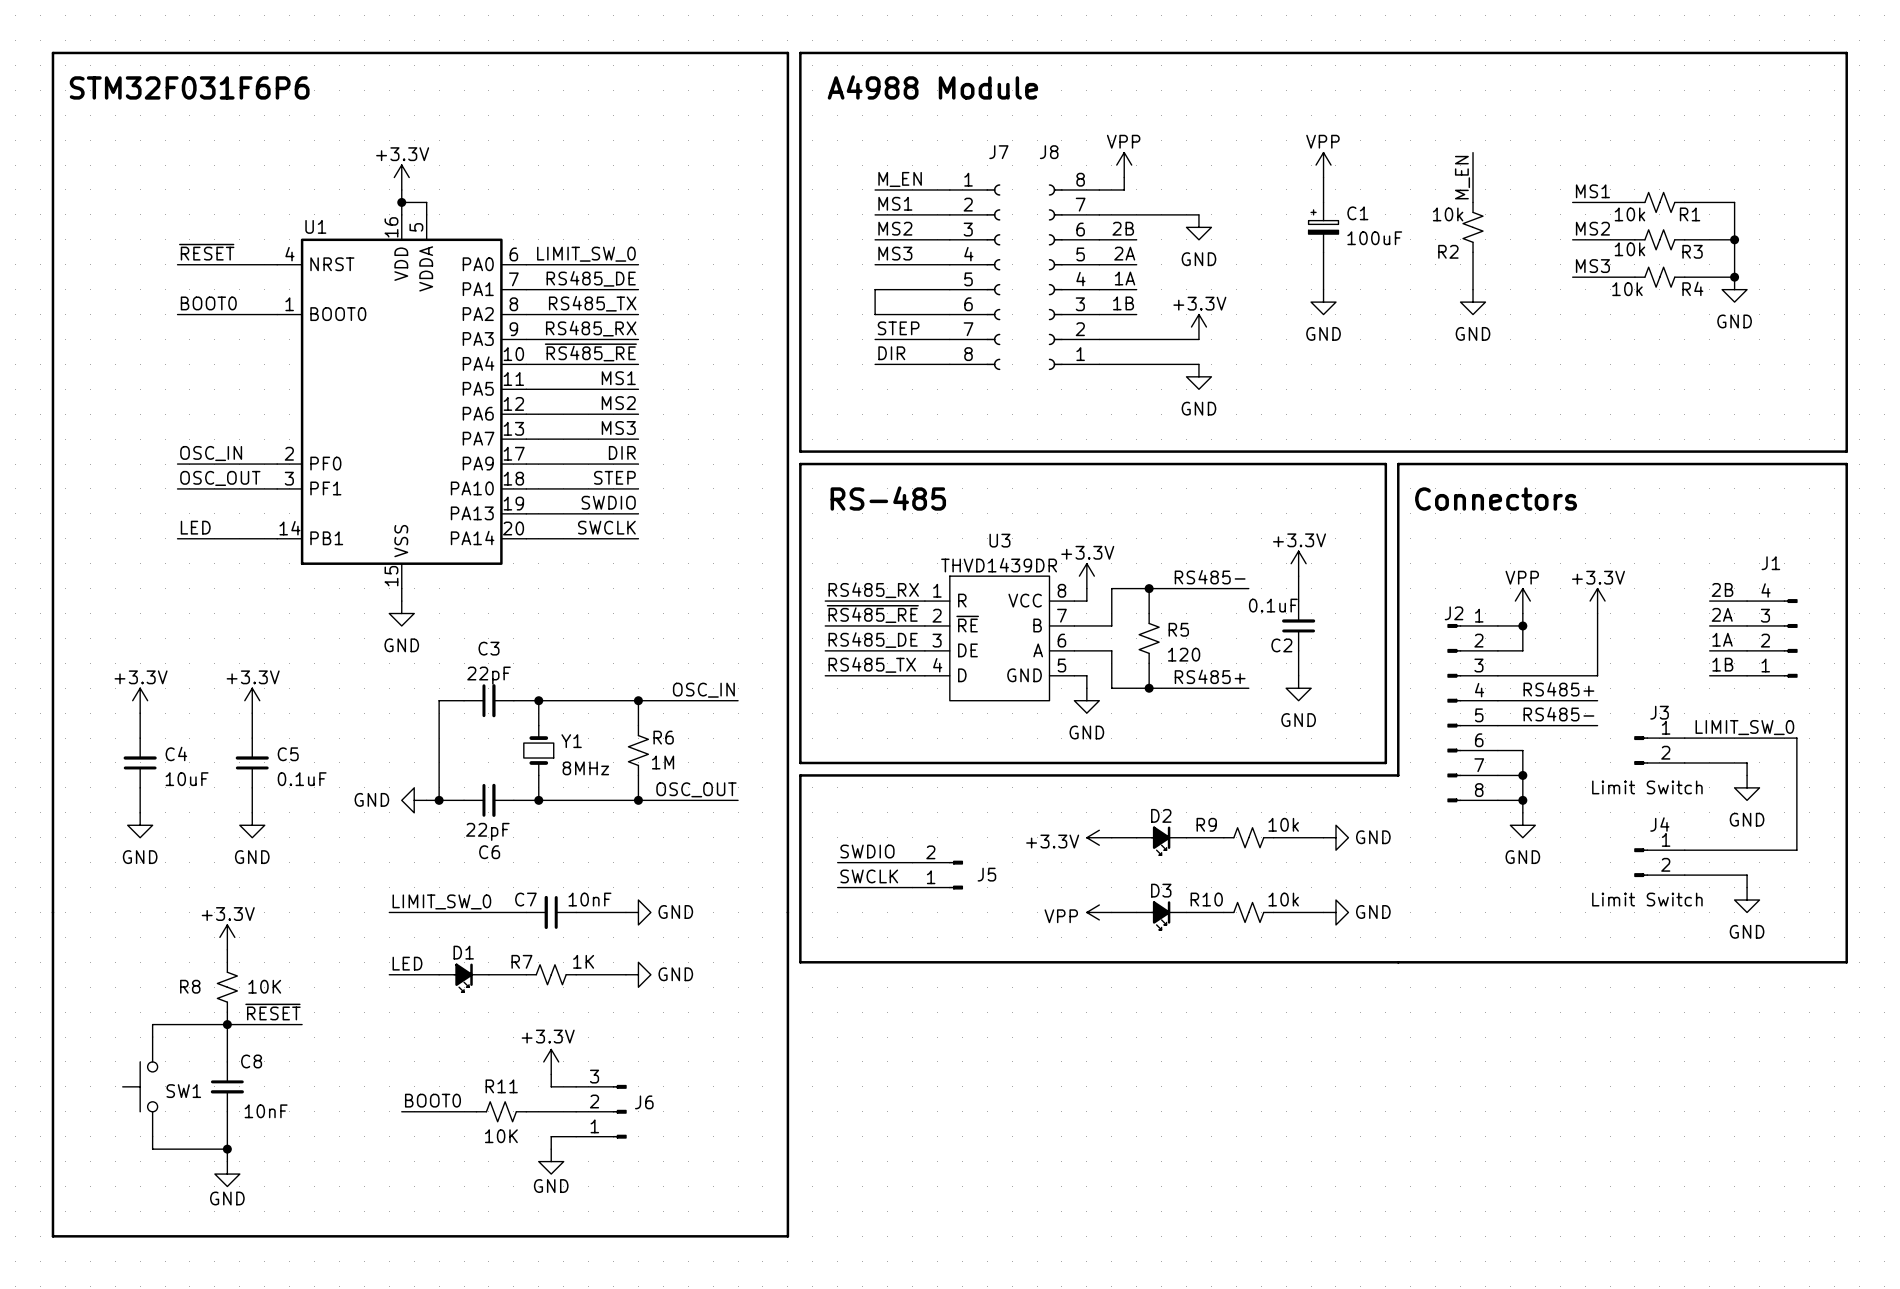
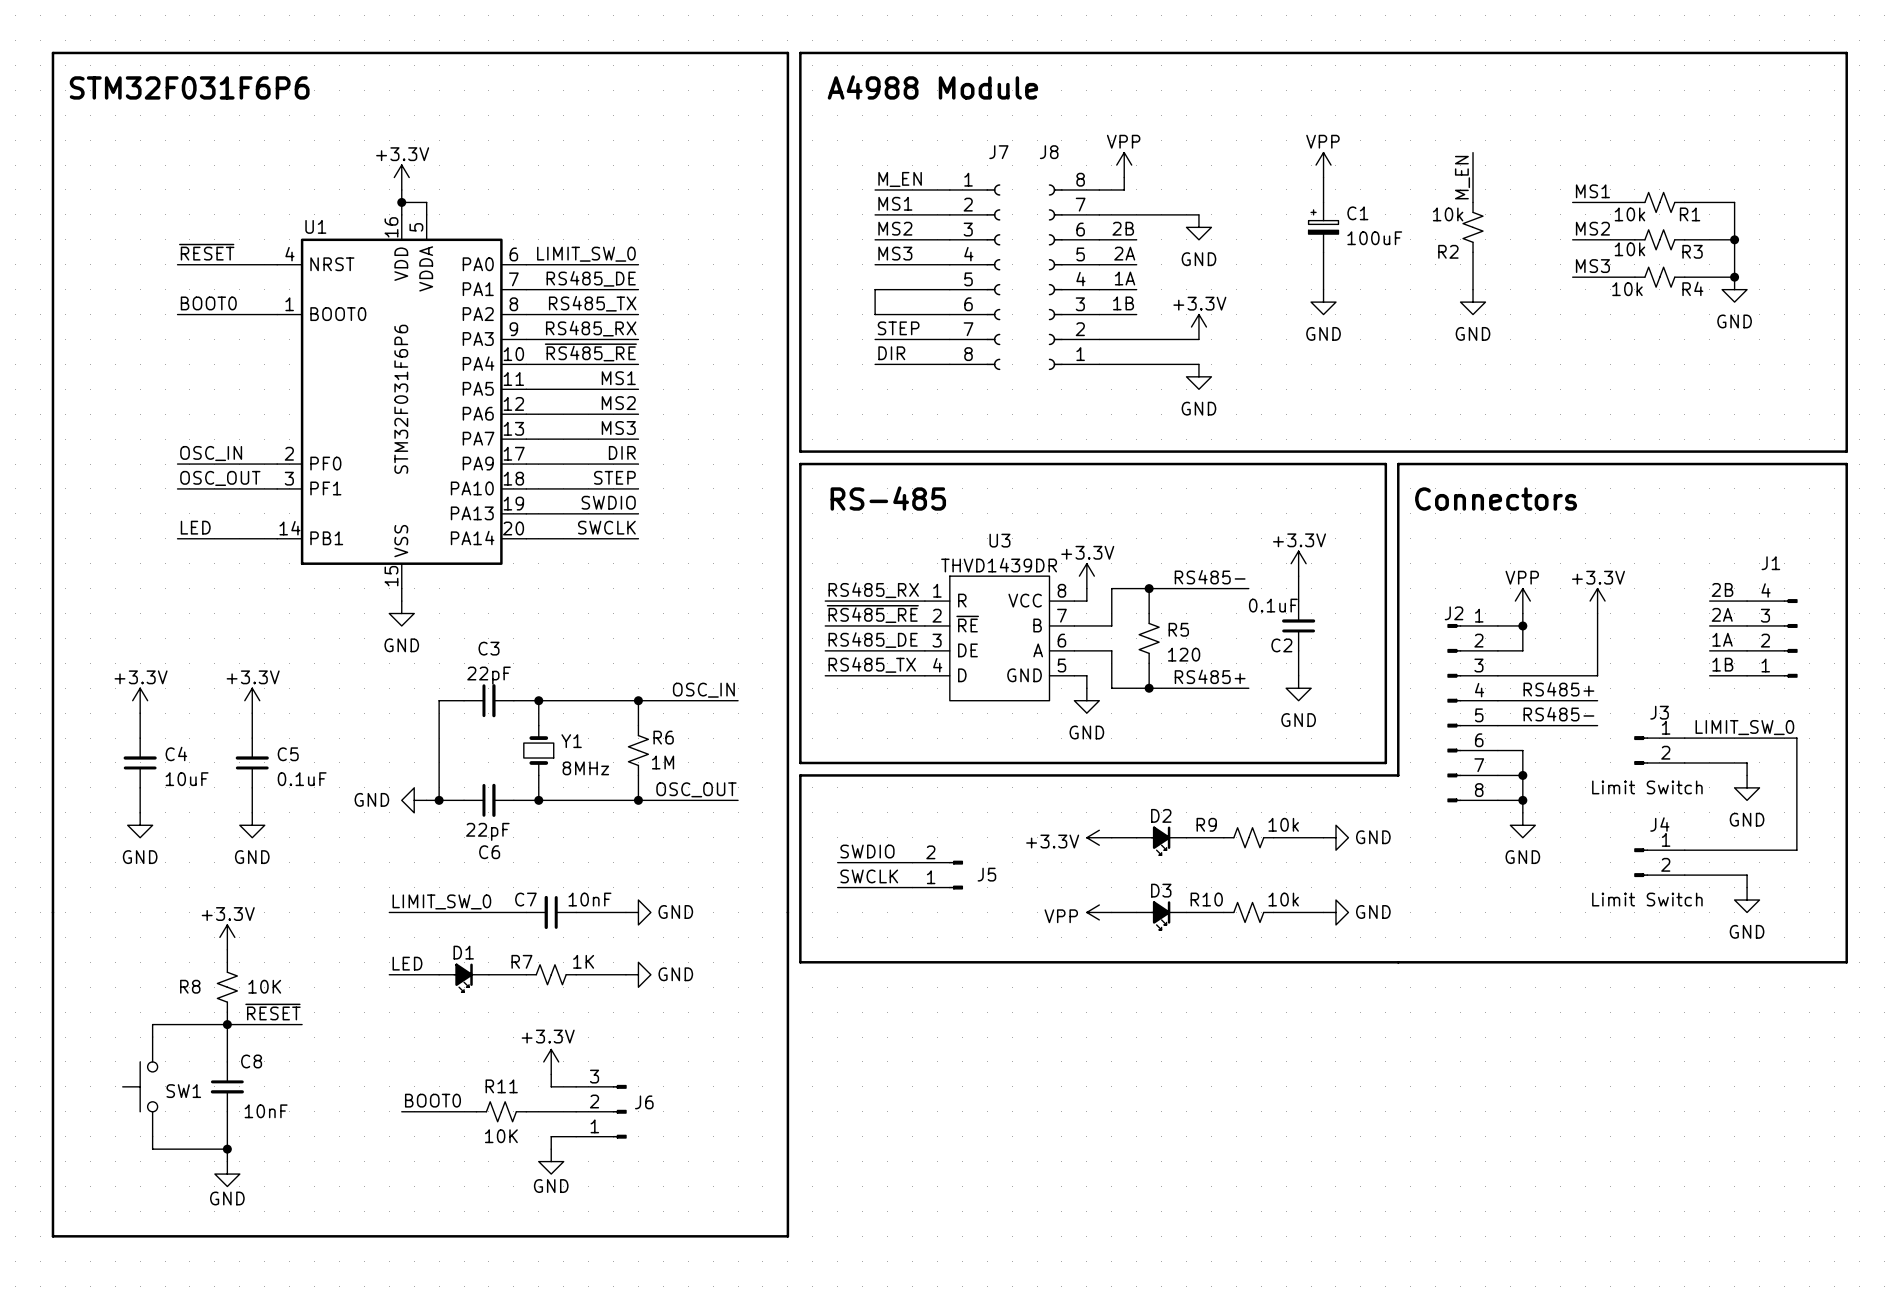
U1 value: none -> STM32F031F6P6 (401, 399)

